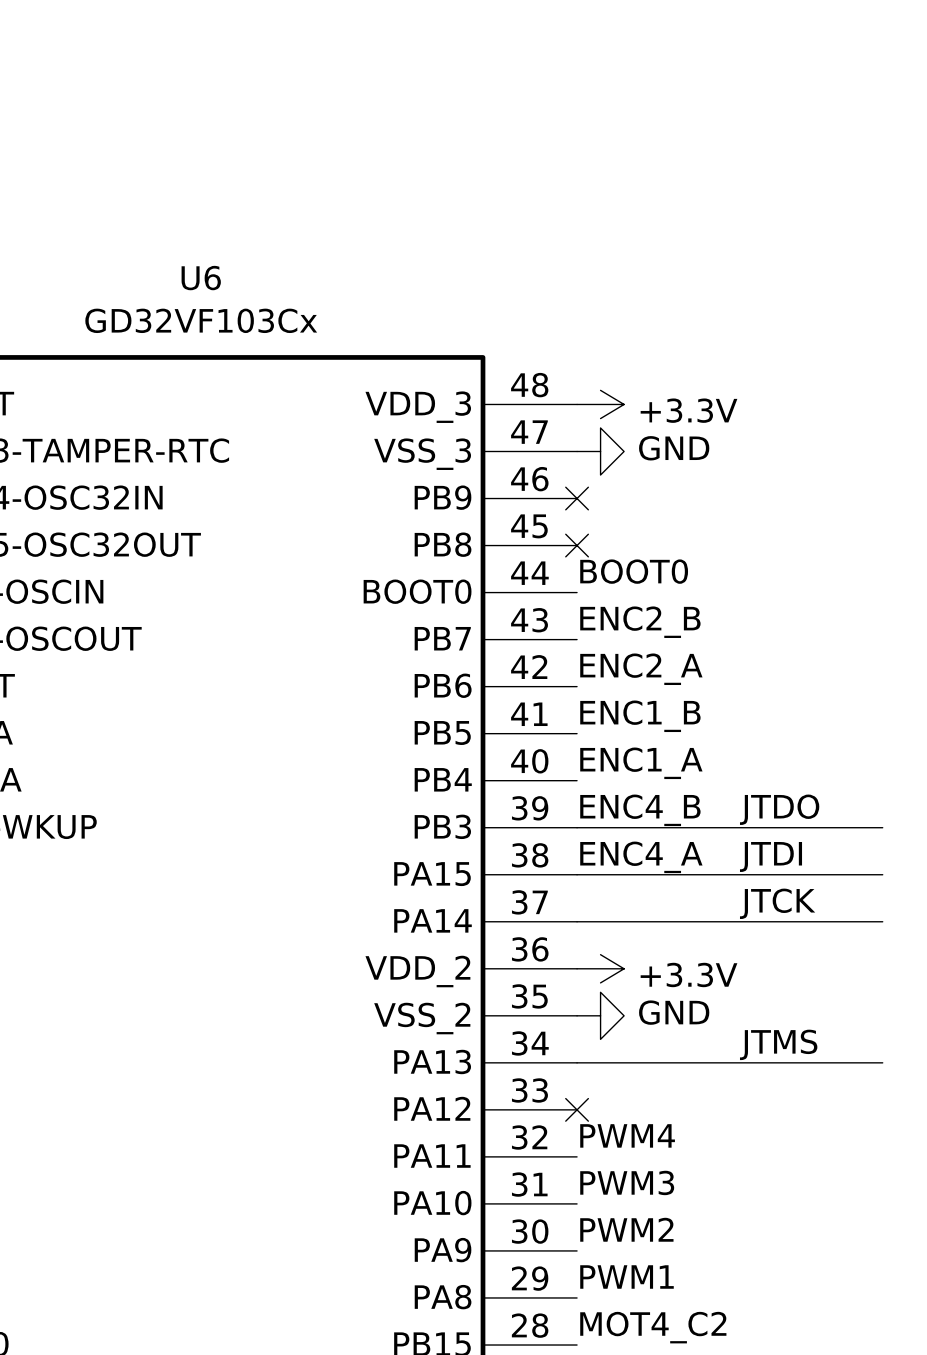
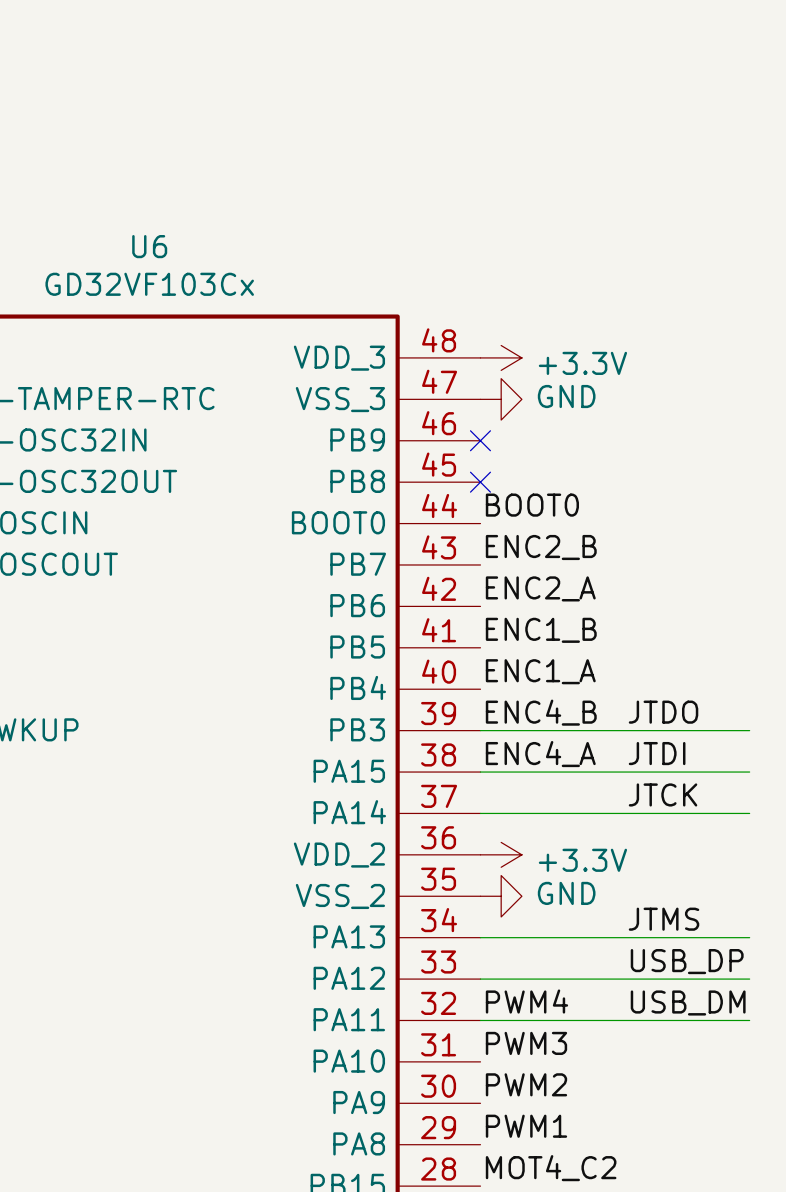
label: none -> USB_DP (687, 961)
wire: none -> (480, 979) (749, 979)
no-connect mark: (577, 1109) -> none
label: none -> USB_DM (688, 1002)
wire: none -> (480, 1020) (749, 1020)

